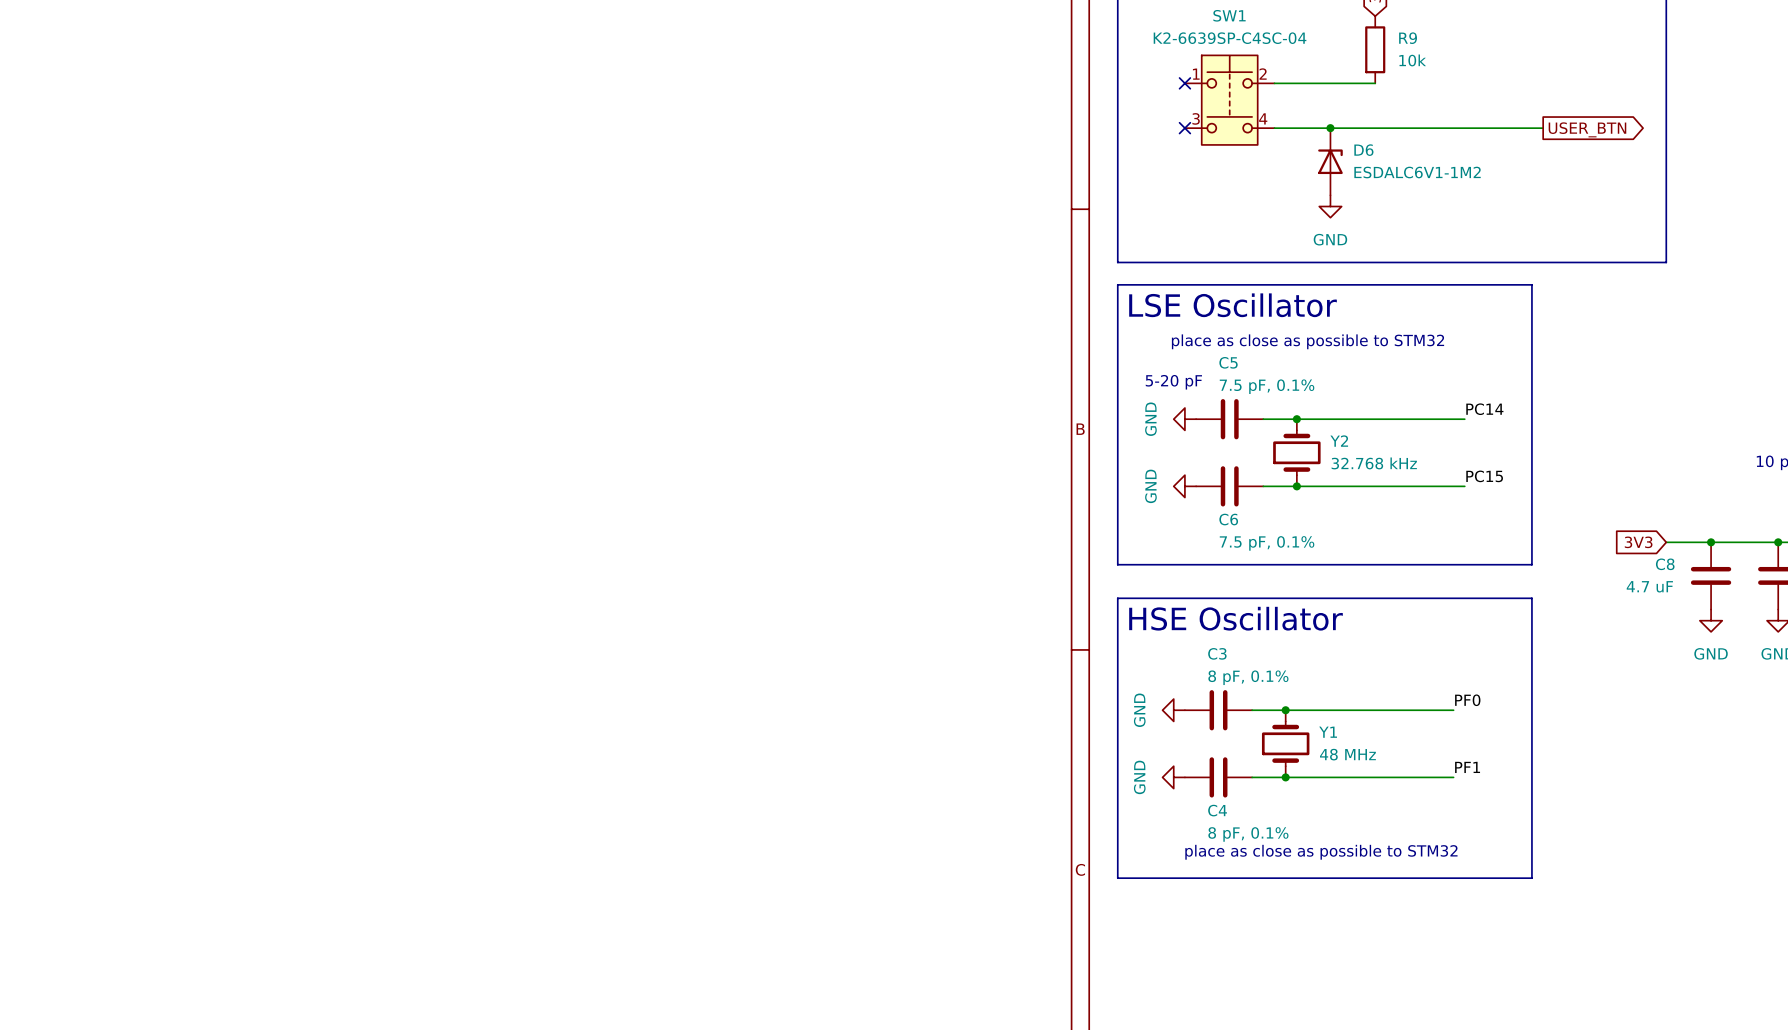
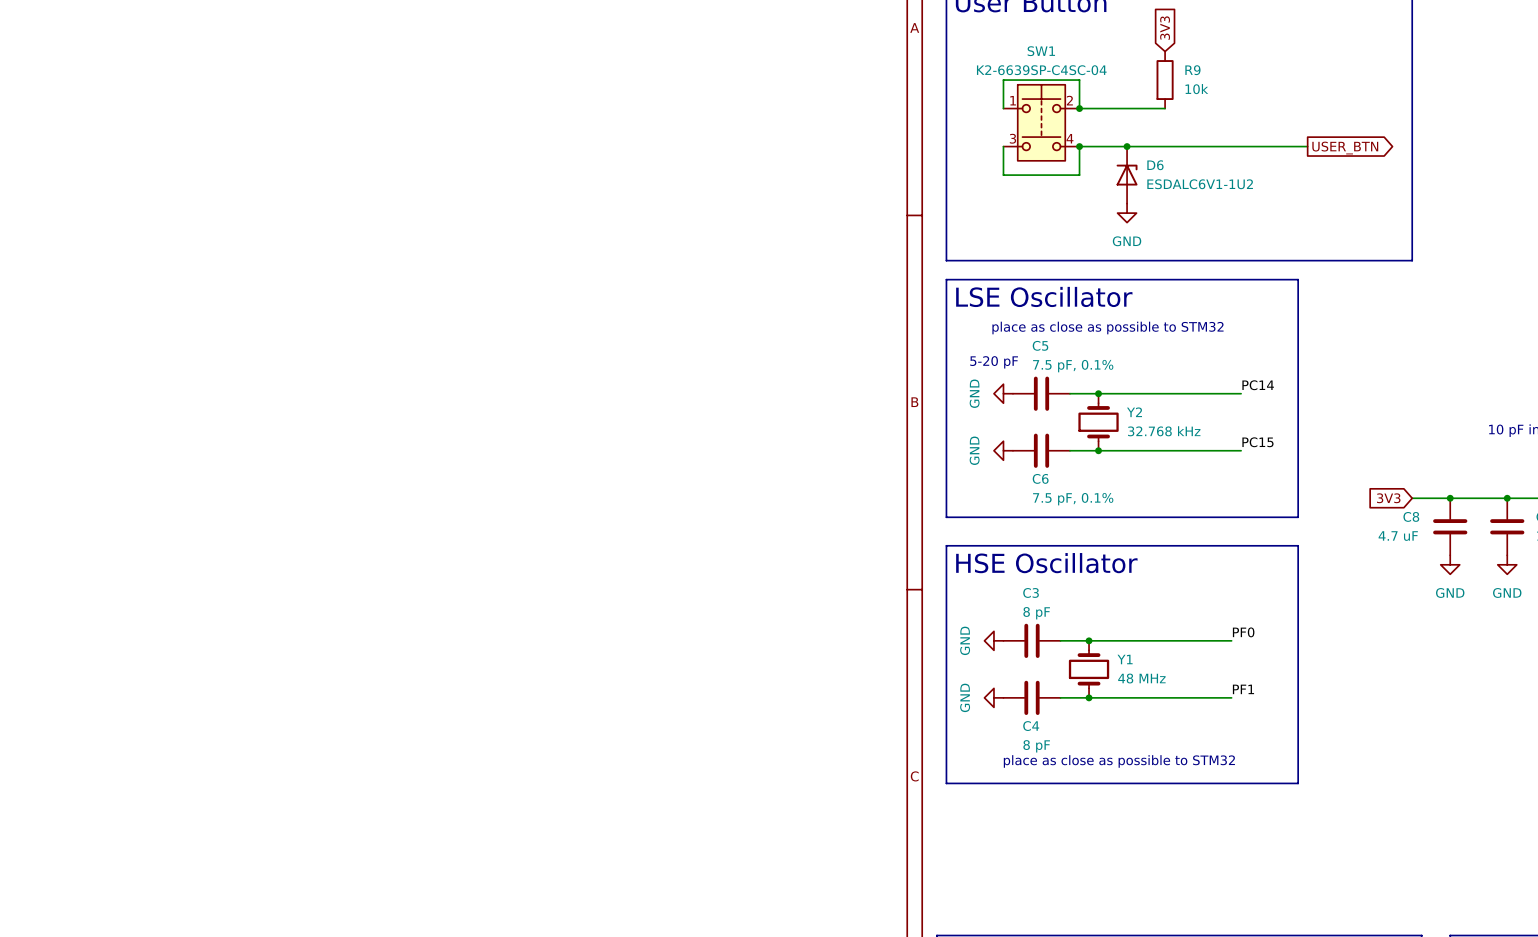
wire: none -> (1003, 108) (1003, 80) (1079, 80) (1079, 108)
no-connect mark: (1184, 83) -> none
junction: none -> (1079, 108)
wire: none -> (1003, 146) (1003, 175) (1079, 175) (1079, 146)
no-connect mark: (1184, 128) -> none
junction: none -> (1079, 146)
D6 value: ESDALC6V1-1M2 (1417, 172) -> ESDALC6V1-1U2 (1200, 184)
C3 value: 8 pF, 0.1% (1248, 677) -> 8 pF (1036, 613)
C4 value: 8 pF, 0.1% (1248, 834) -> 8 pF (1036, 746)

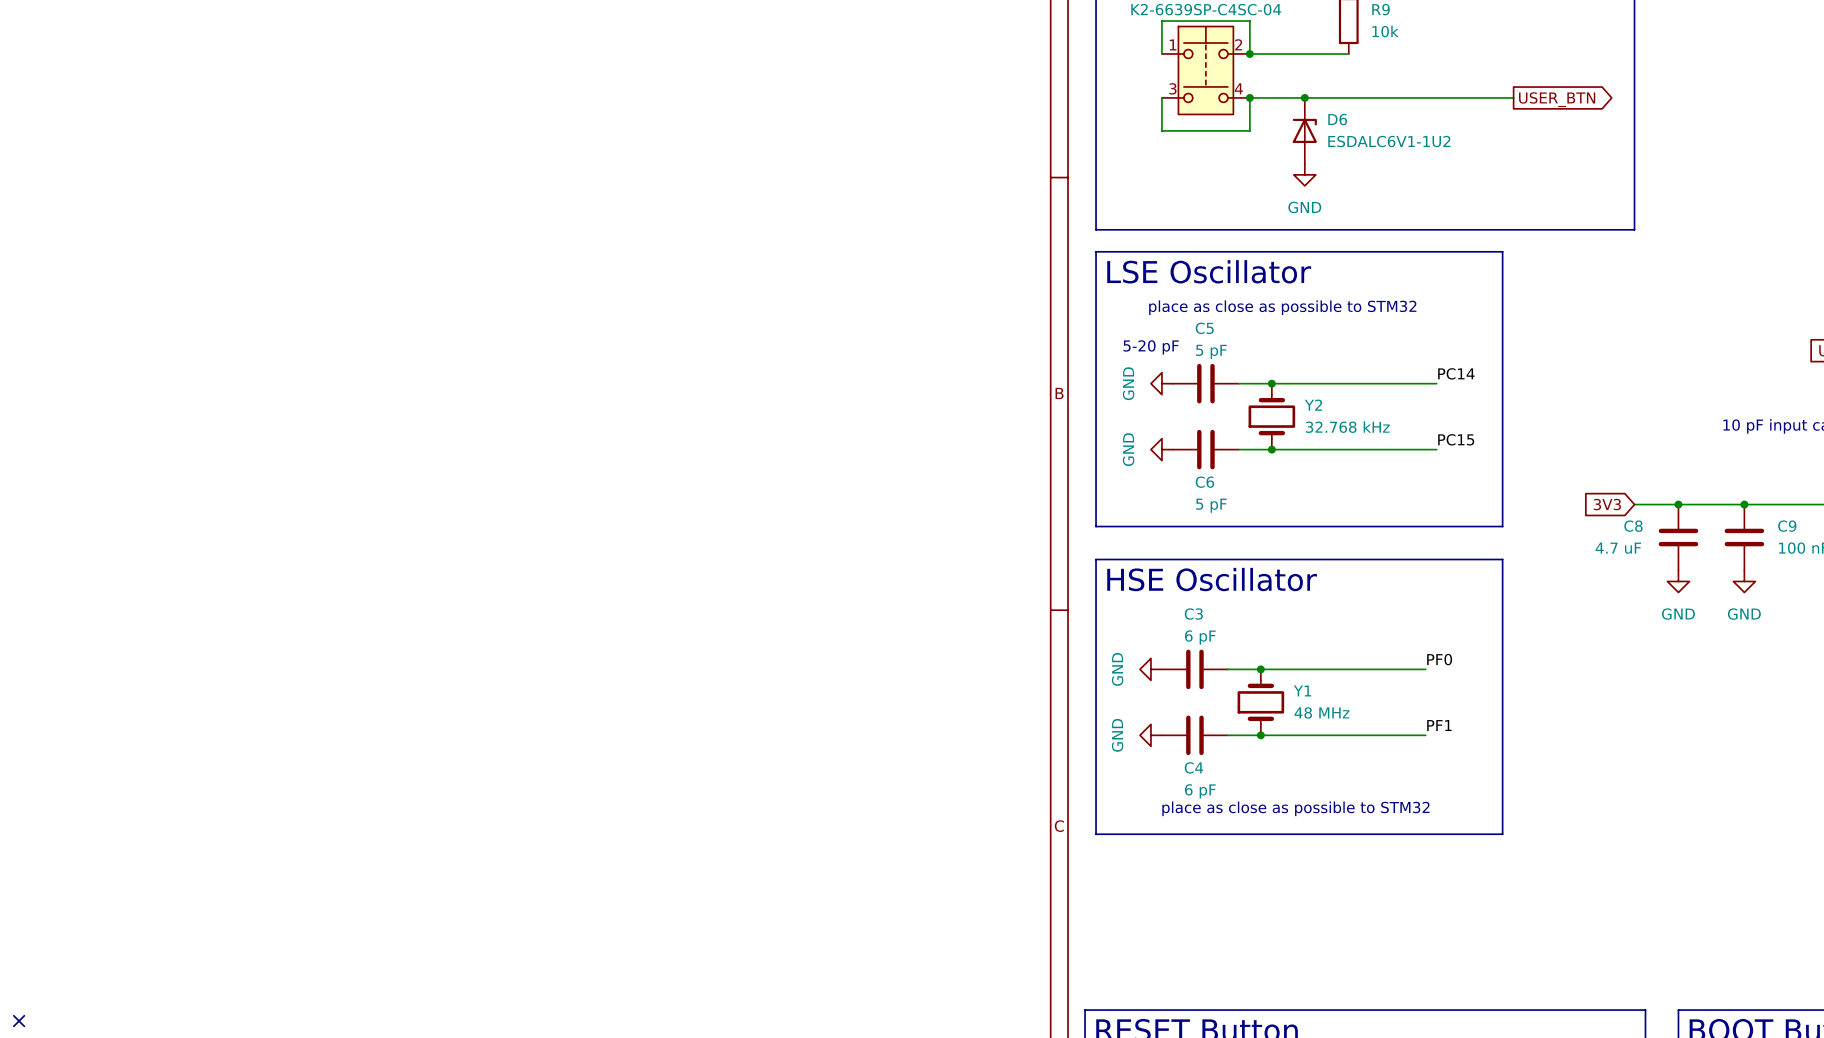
C5 value: 7.5 pF, 0.1% (1073, 366) -> 5 pF (1211, 351)
C6 value: 7.5 pF, 0.1% (1073, 499) -> 5 pF (1211, 505)
C3 value: 8 pF (1036, 613) -> 6 pF (1200, 637)
C4 value: 8 pF (1036, 746) -> 6 pF (1200, 791)

